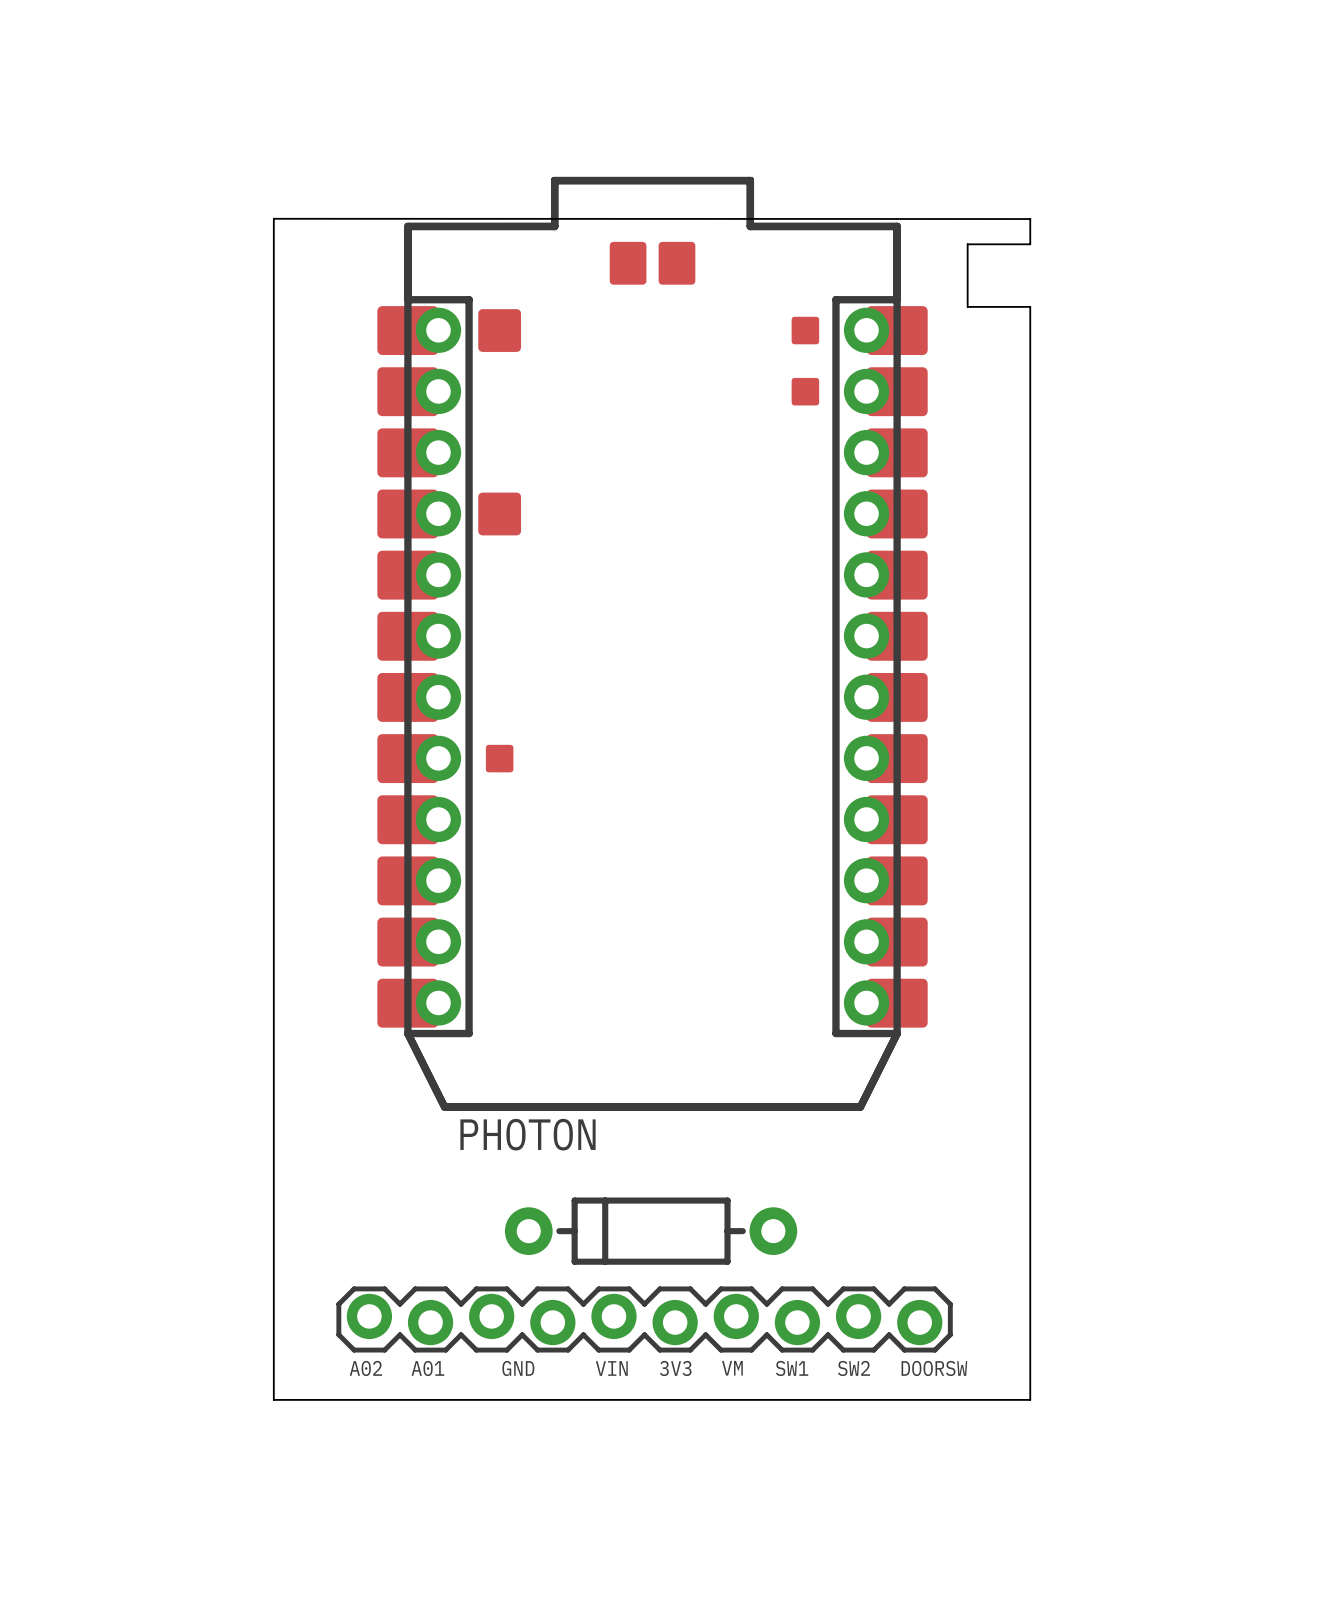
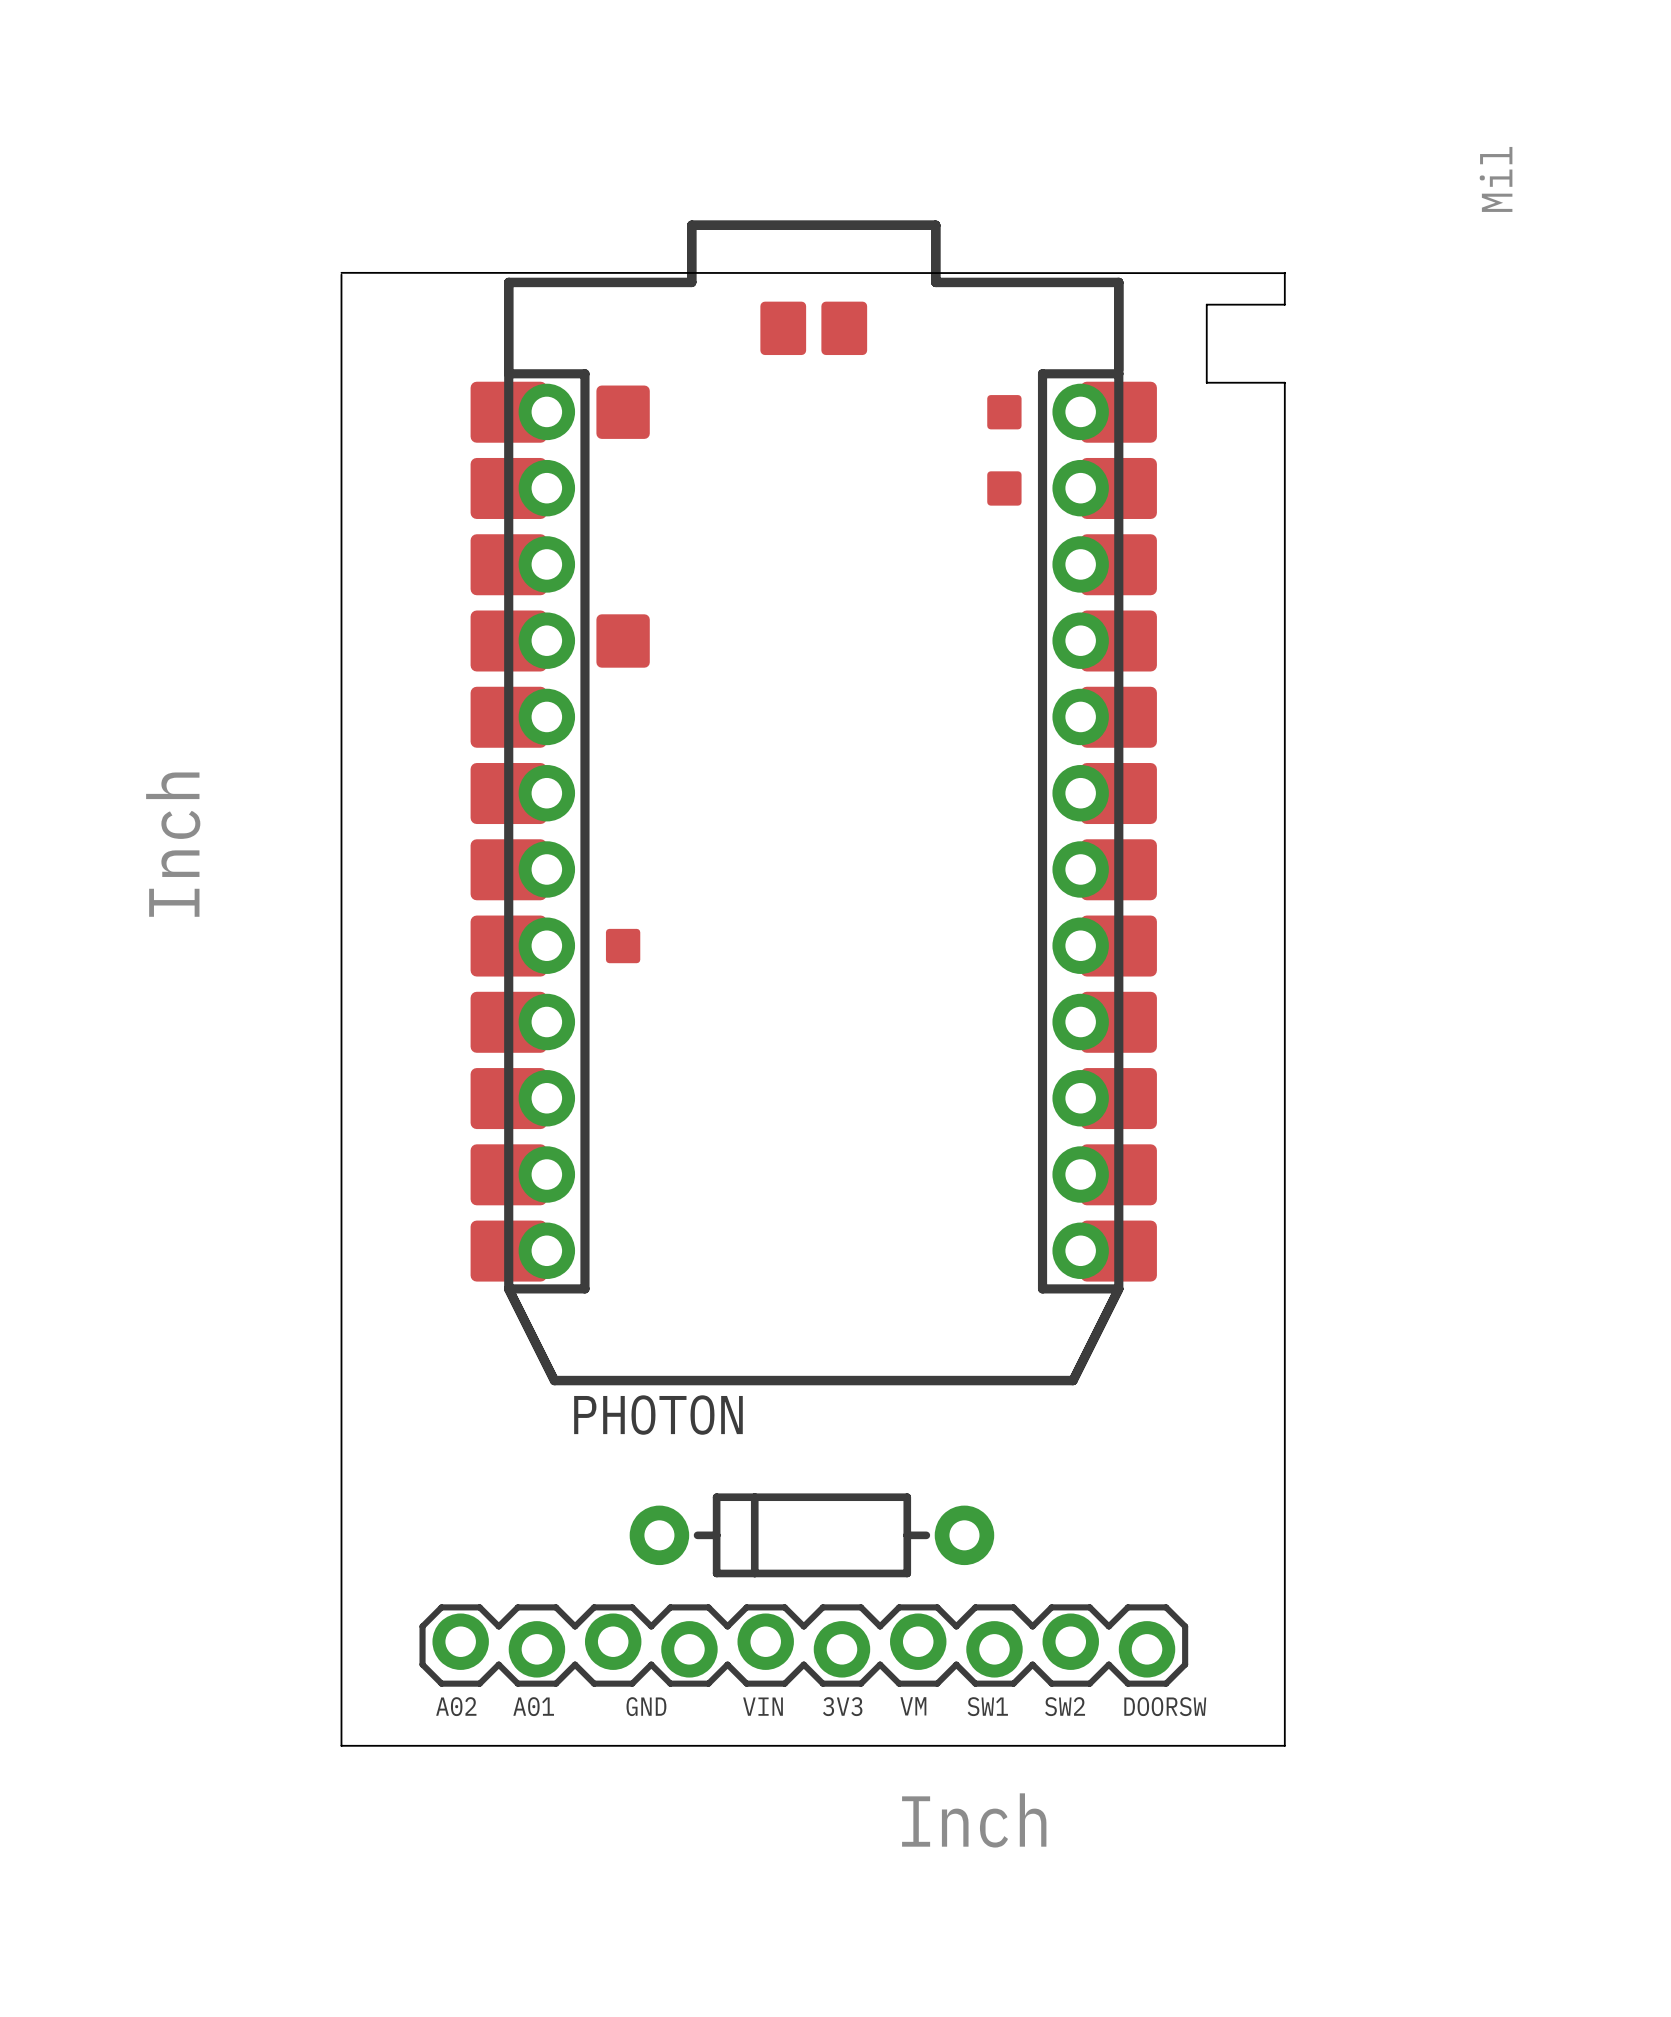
text: none -> Mil (1496, 179)
text: none -> Inch (173, 844)
text: none -> Inch (974, 1820)

